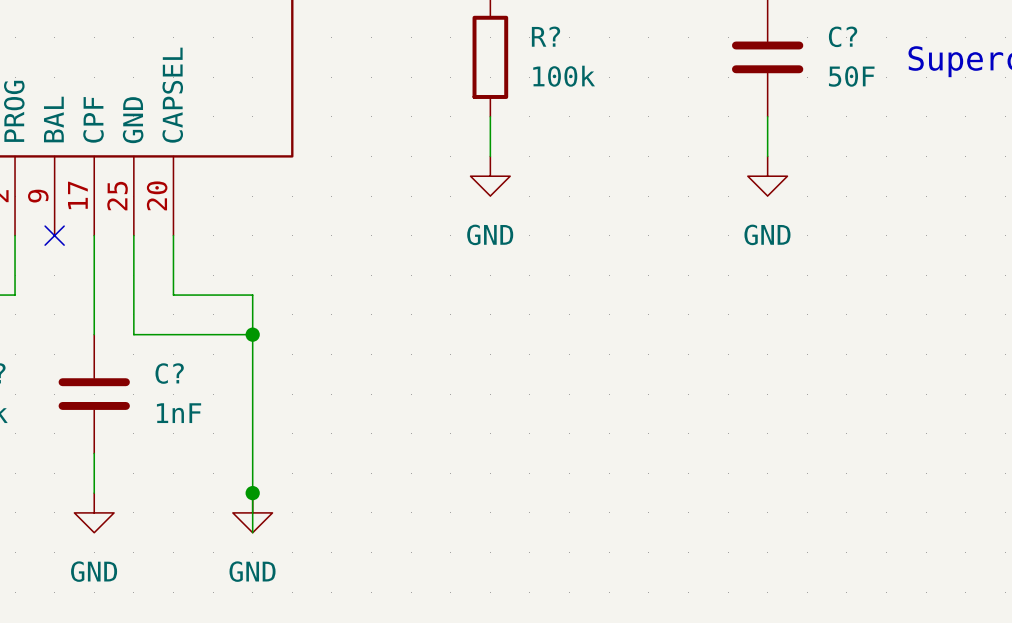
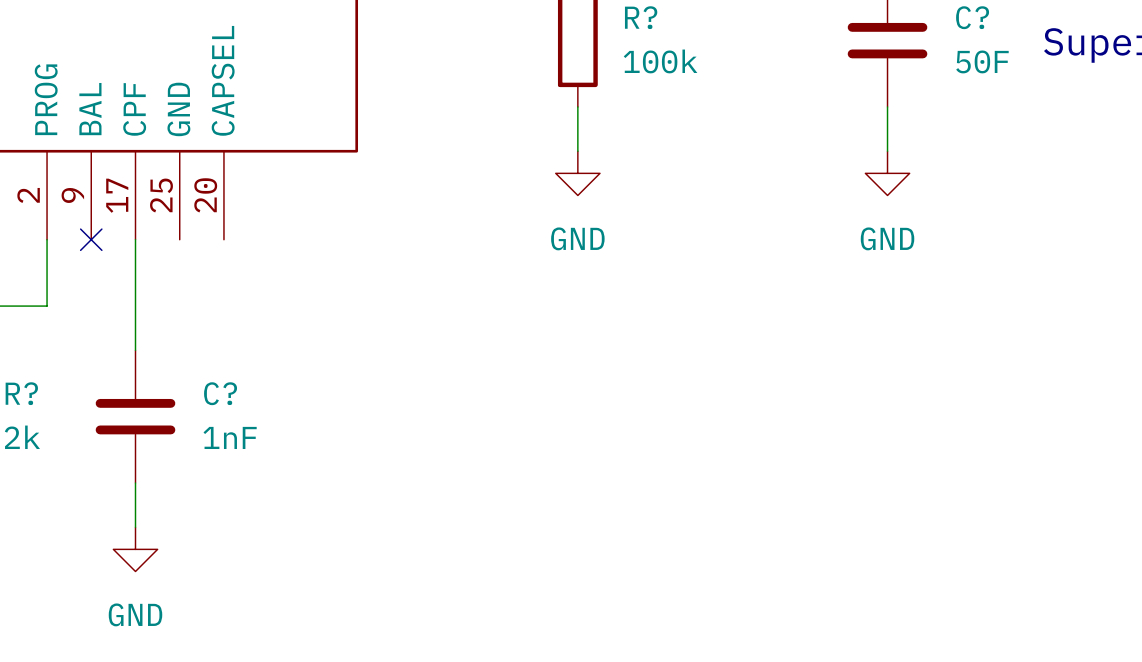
wire: (133, 235) (133, 334) (252, 334) -> none
wire: (173, 235) (173, 295) (252, 295) (252, 532) -> none
junction: (252, 334) -> none
junction: (252, 493) -> none
power symbol: GND (252, 512) -> none

